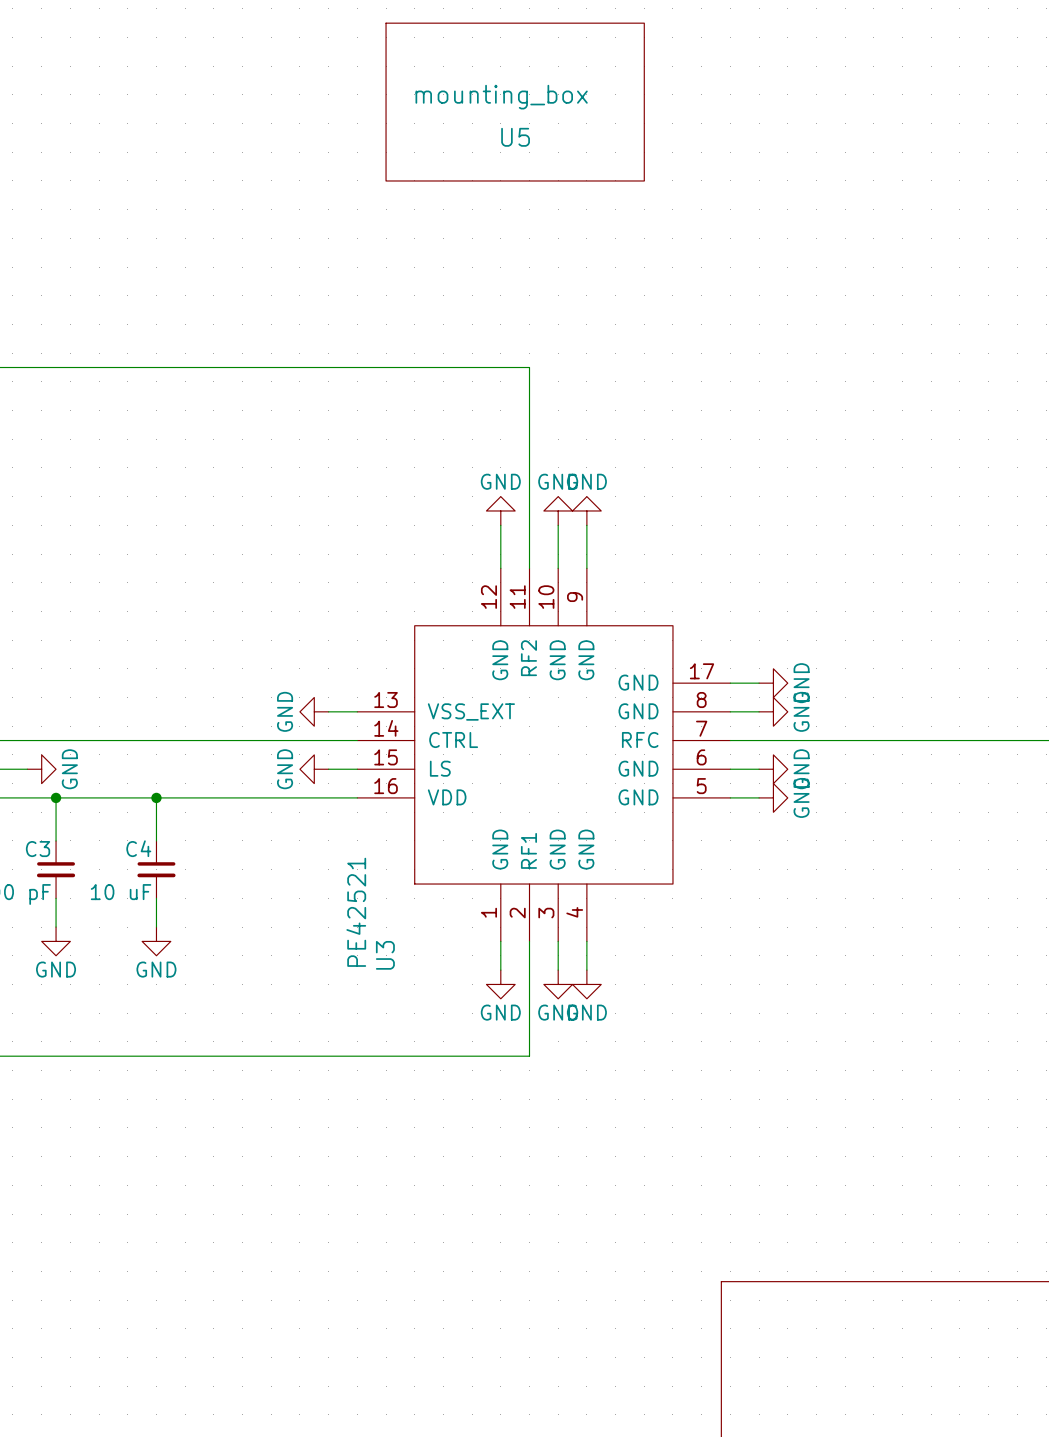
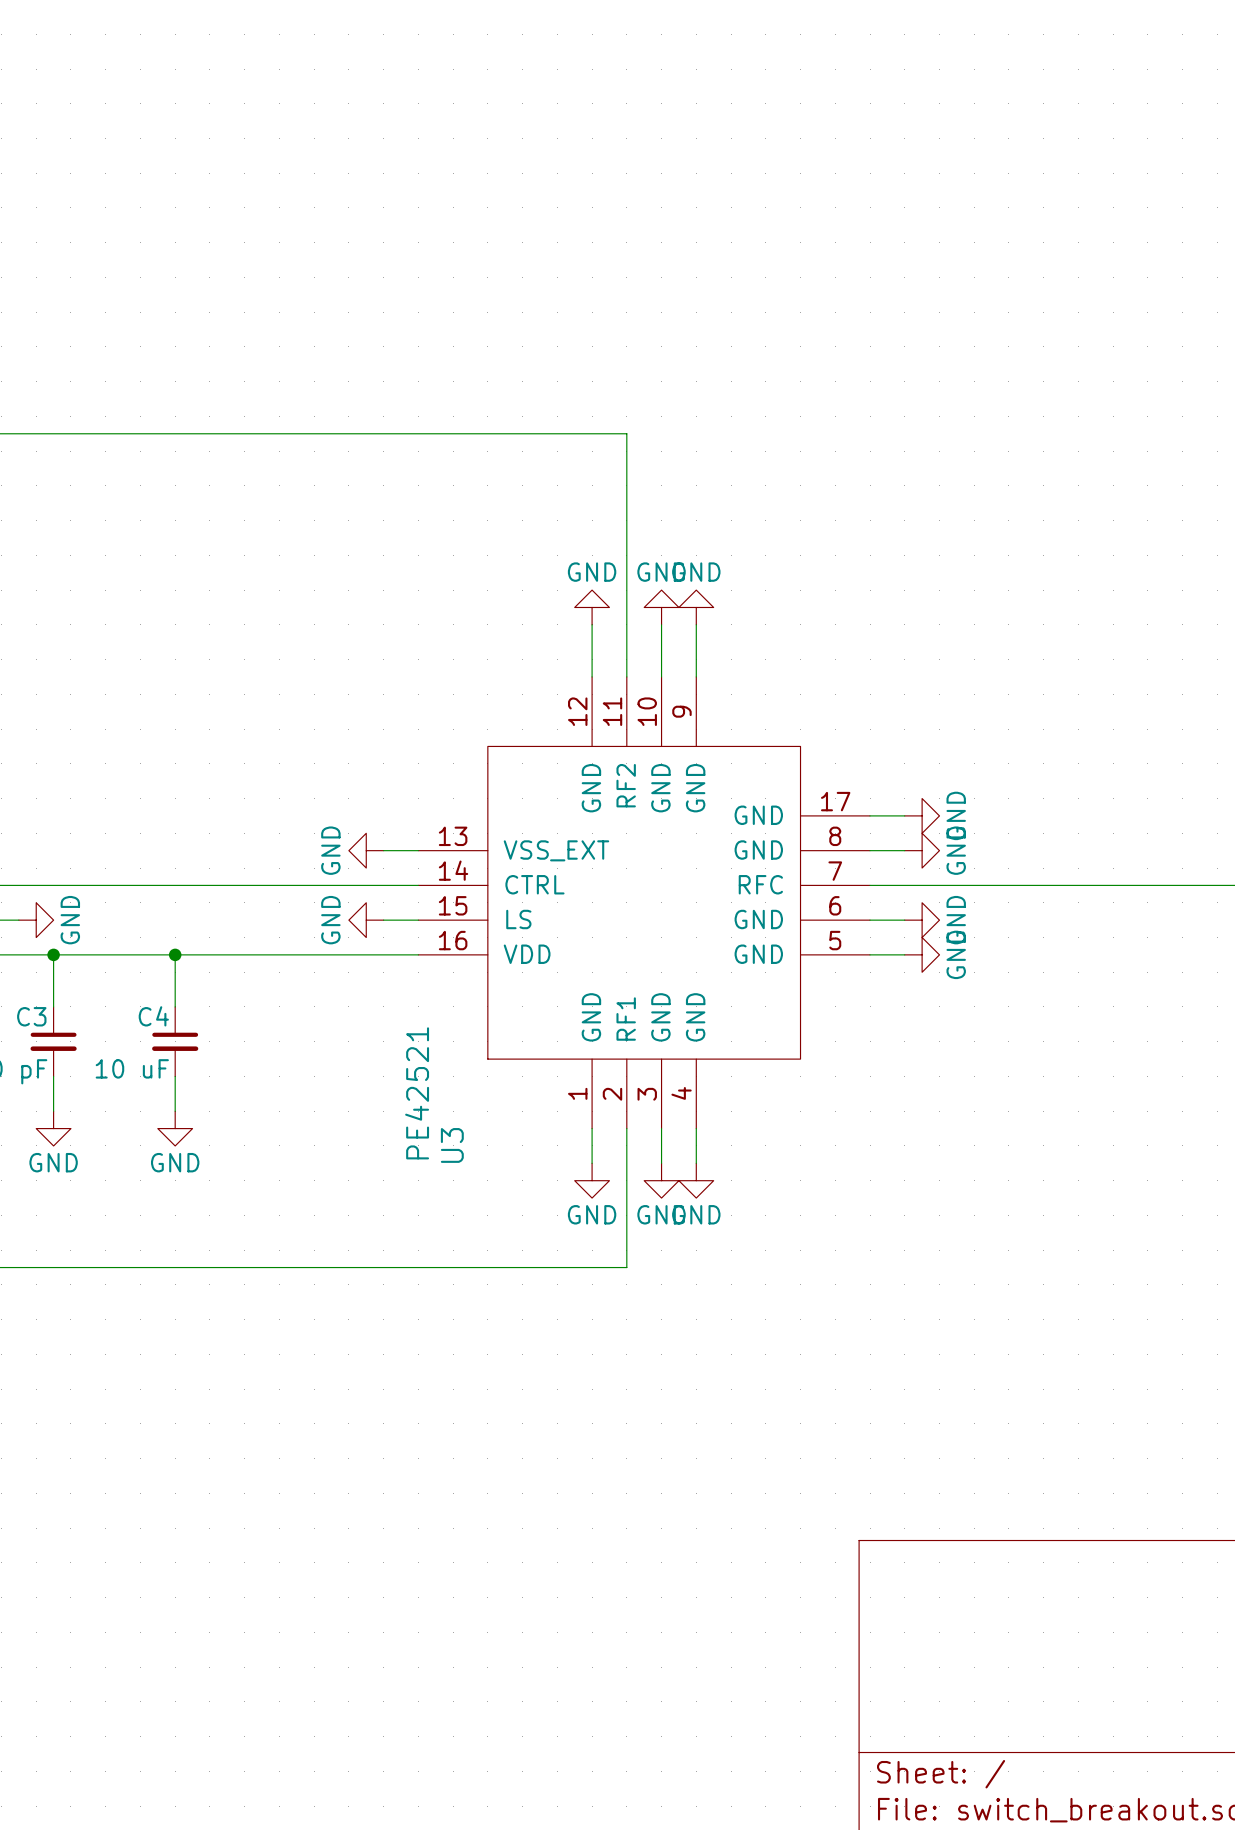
U5: mounting_box (515, 102) -> none

